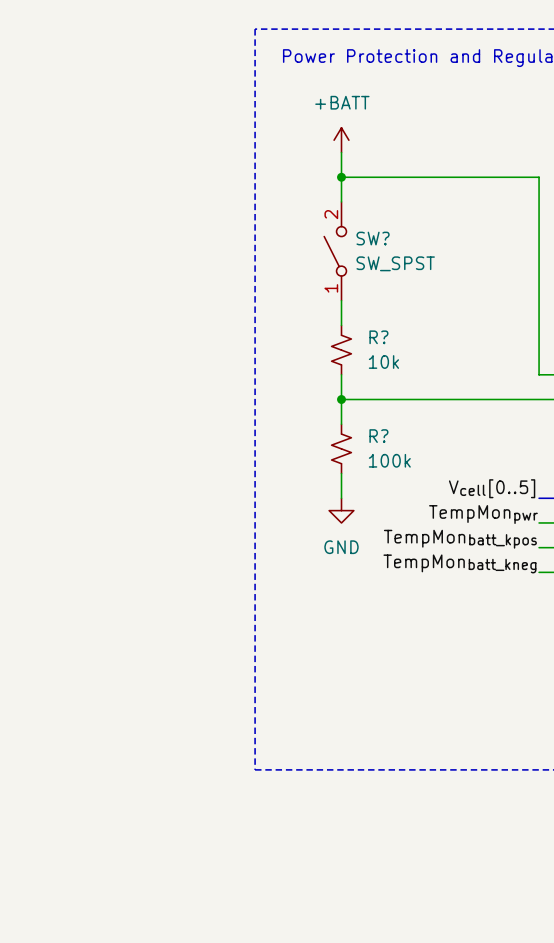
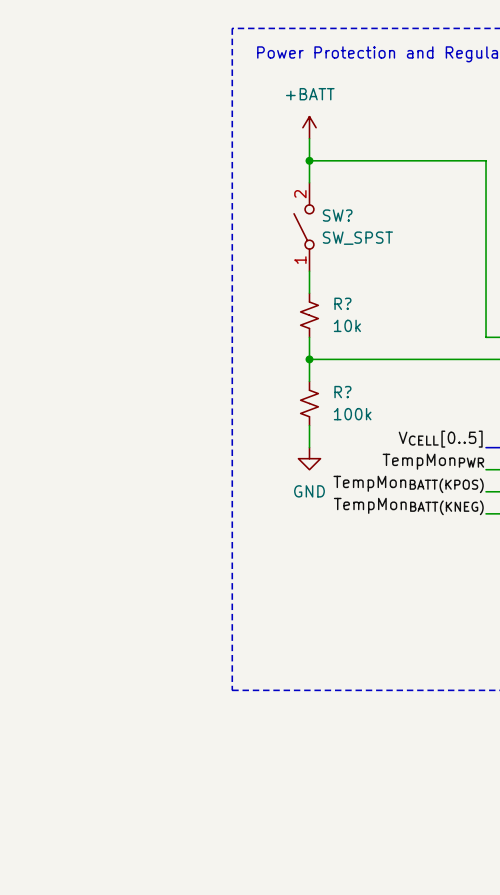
label: Vcell[0..5] (492, 488) -> VCELL[0..5] (440, 439)
label: TempMonpwr (483, 514) -> TempMonPWR (433, 461)
label: TempMonbatt_kpos (460, 539) -> TempMonBATT(KPOS) (408, 484)
label: TempMonbatt_kneg (459, 563) -> TempMonBATT(KNEG) (408, 506)

